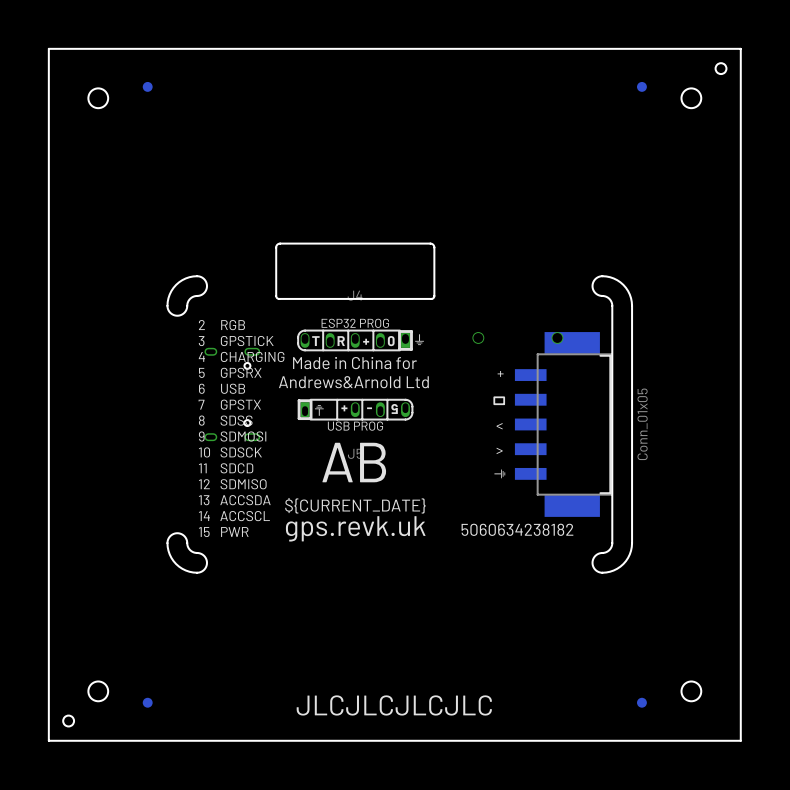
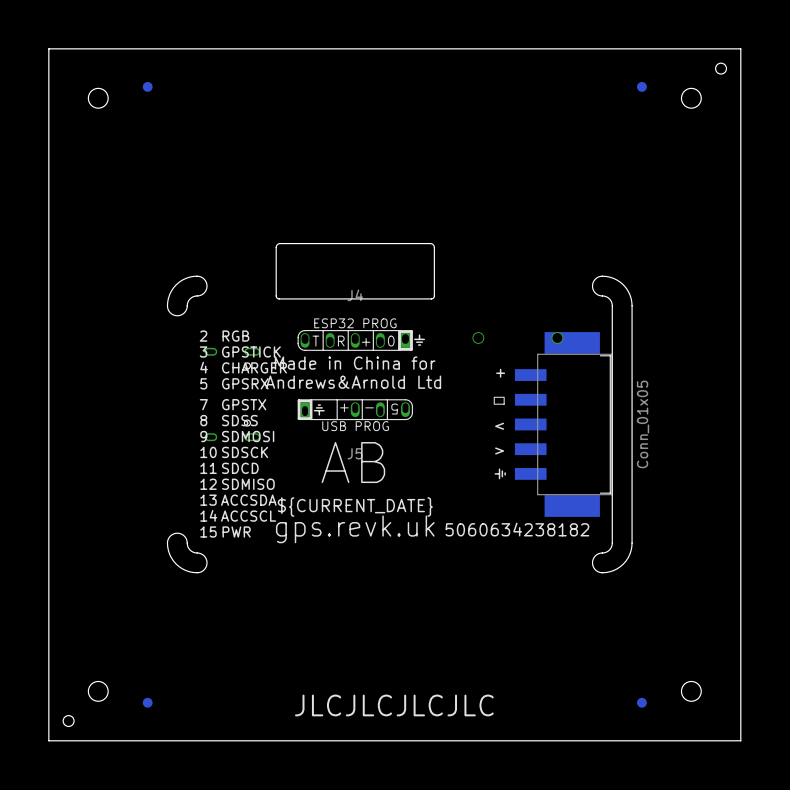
text: 2 (201, 325) -> none
text: RGB (233, 325) -> none
text: 3 (201, 341) -> 2 (203, 336)
text: GPSTICK (247, 341) -> RGB (235, 336)
text: 4 (201, 356) -> 3 (203, 351)
text: CHARGING (252, 356) -> GPSTICK (251, 351)
text: 5 (201, 372) -> 4 (204, 367)
text: GPSRX (241, 372) -> CHARGER (254, 367)
text: 6 (201, 388) -> 5 (203, 383)
text: USB (233, 388) -> GPSRX (245, 383)

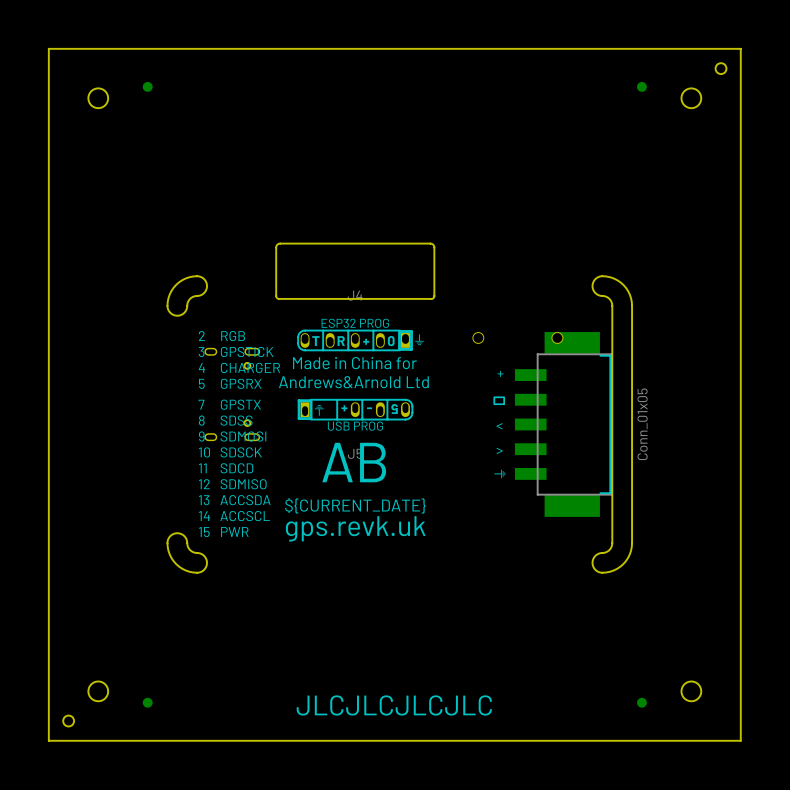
text: 5060634238182 (517, 529) -> none

